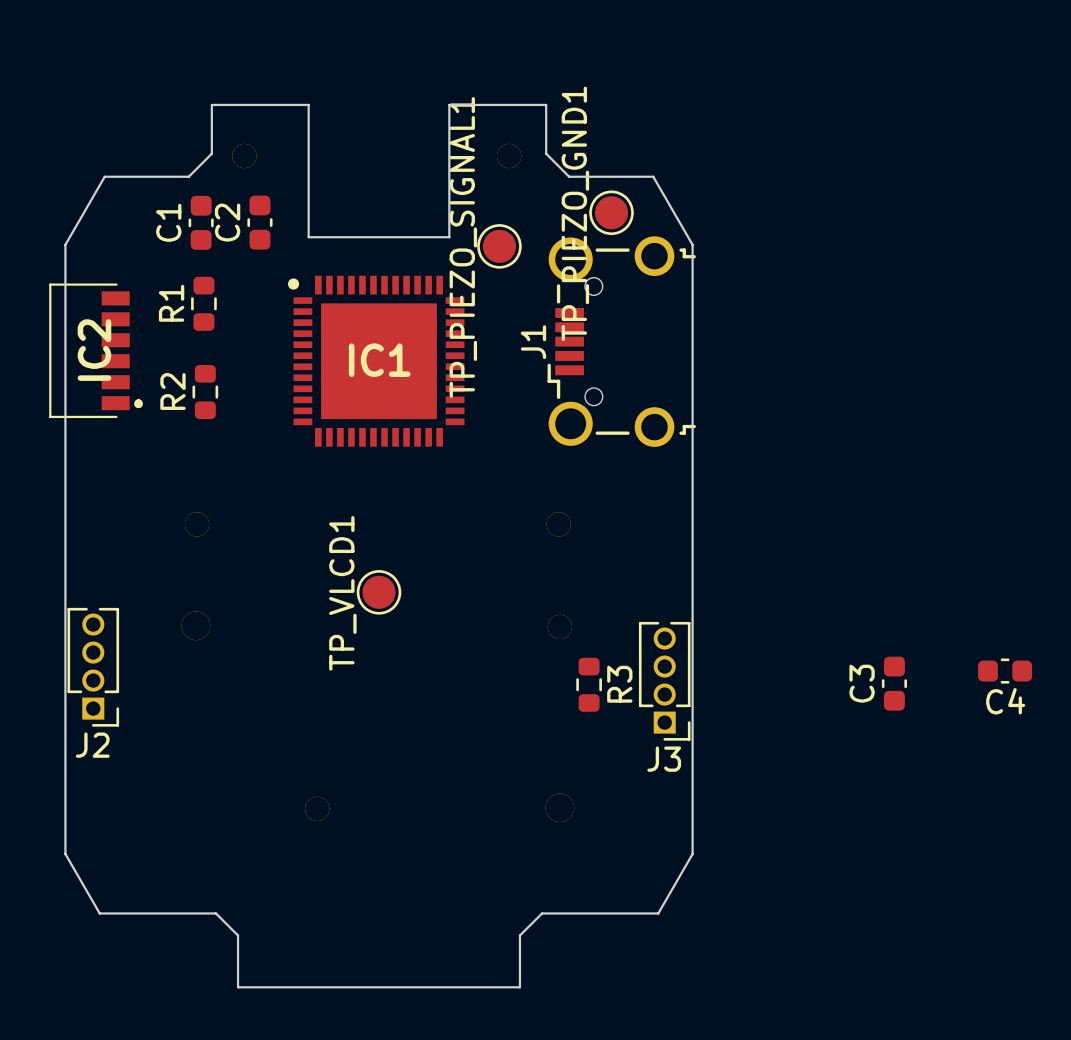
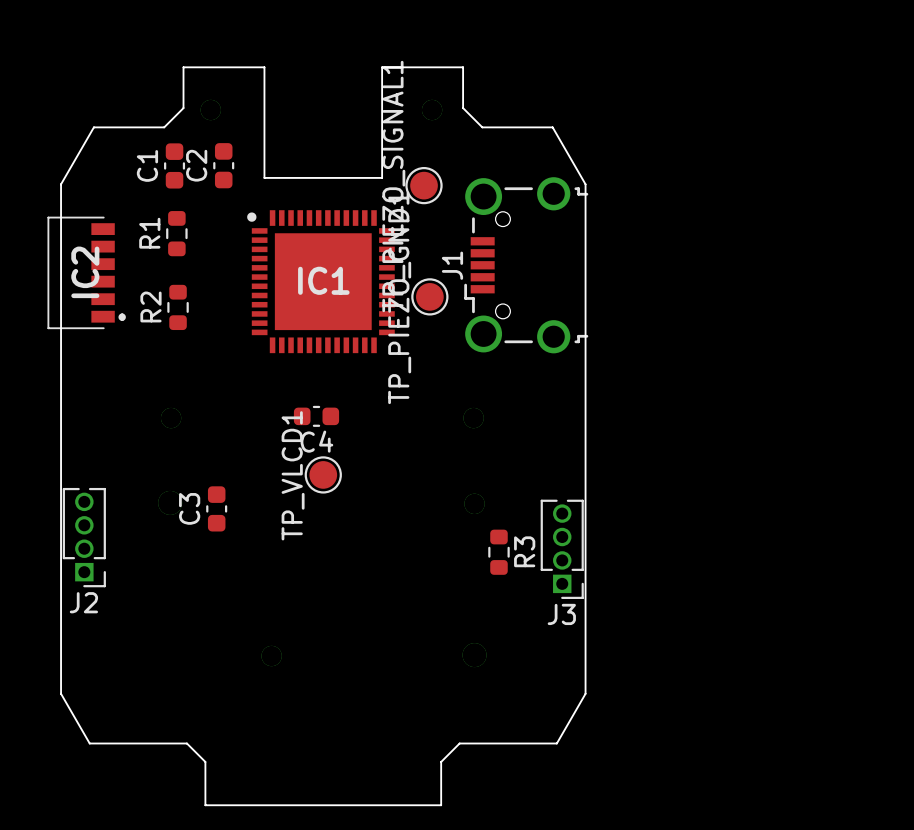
TP_PIEZO_GND1 position: (611, 212) -> (429, 296)
C4 position: (1005, 671) -> (316, 416)
C3 position: (894, 683) -> (216, 508)

